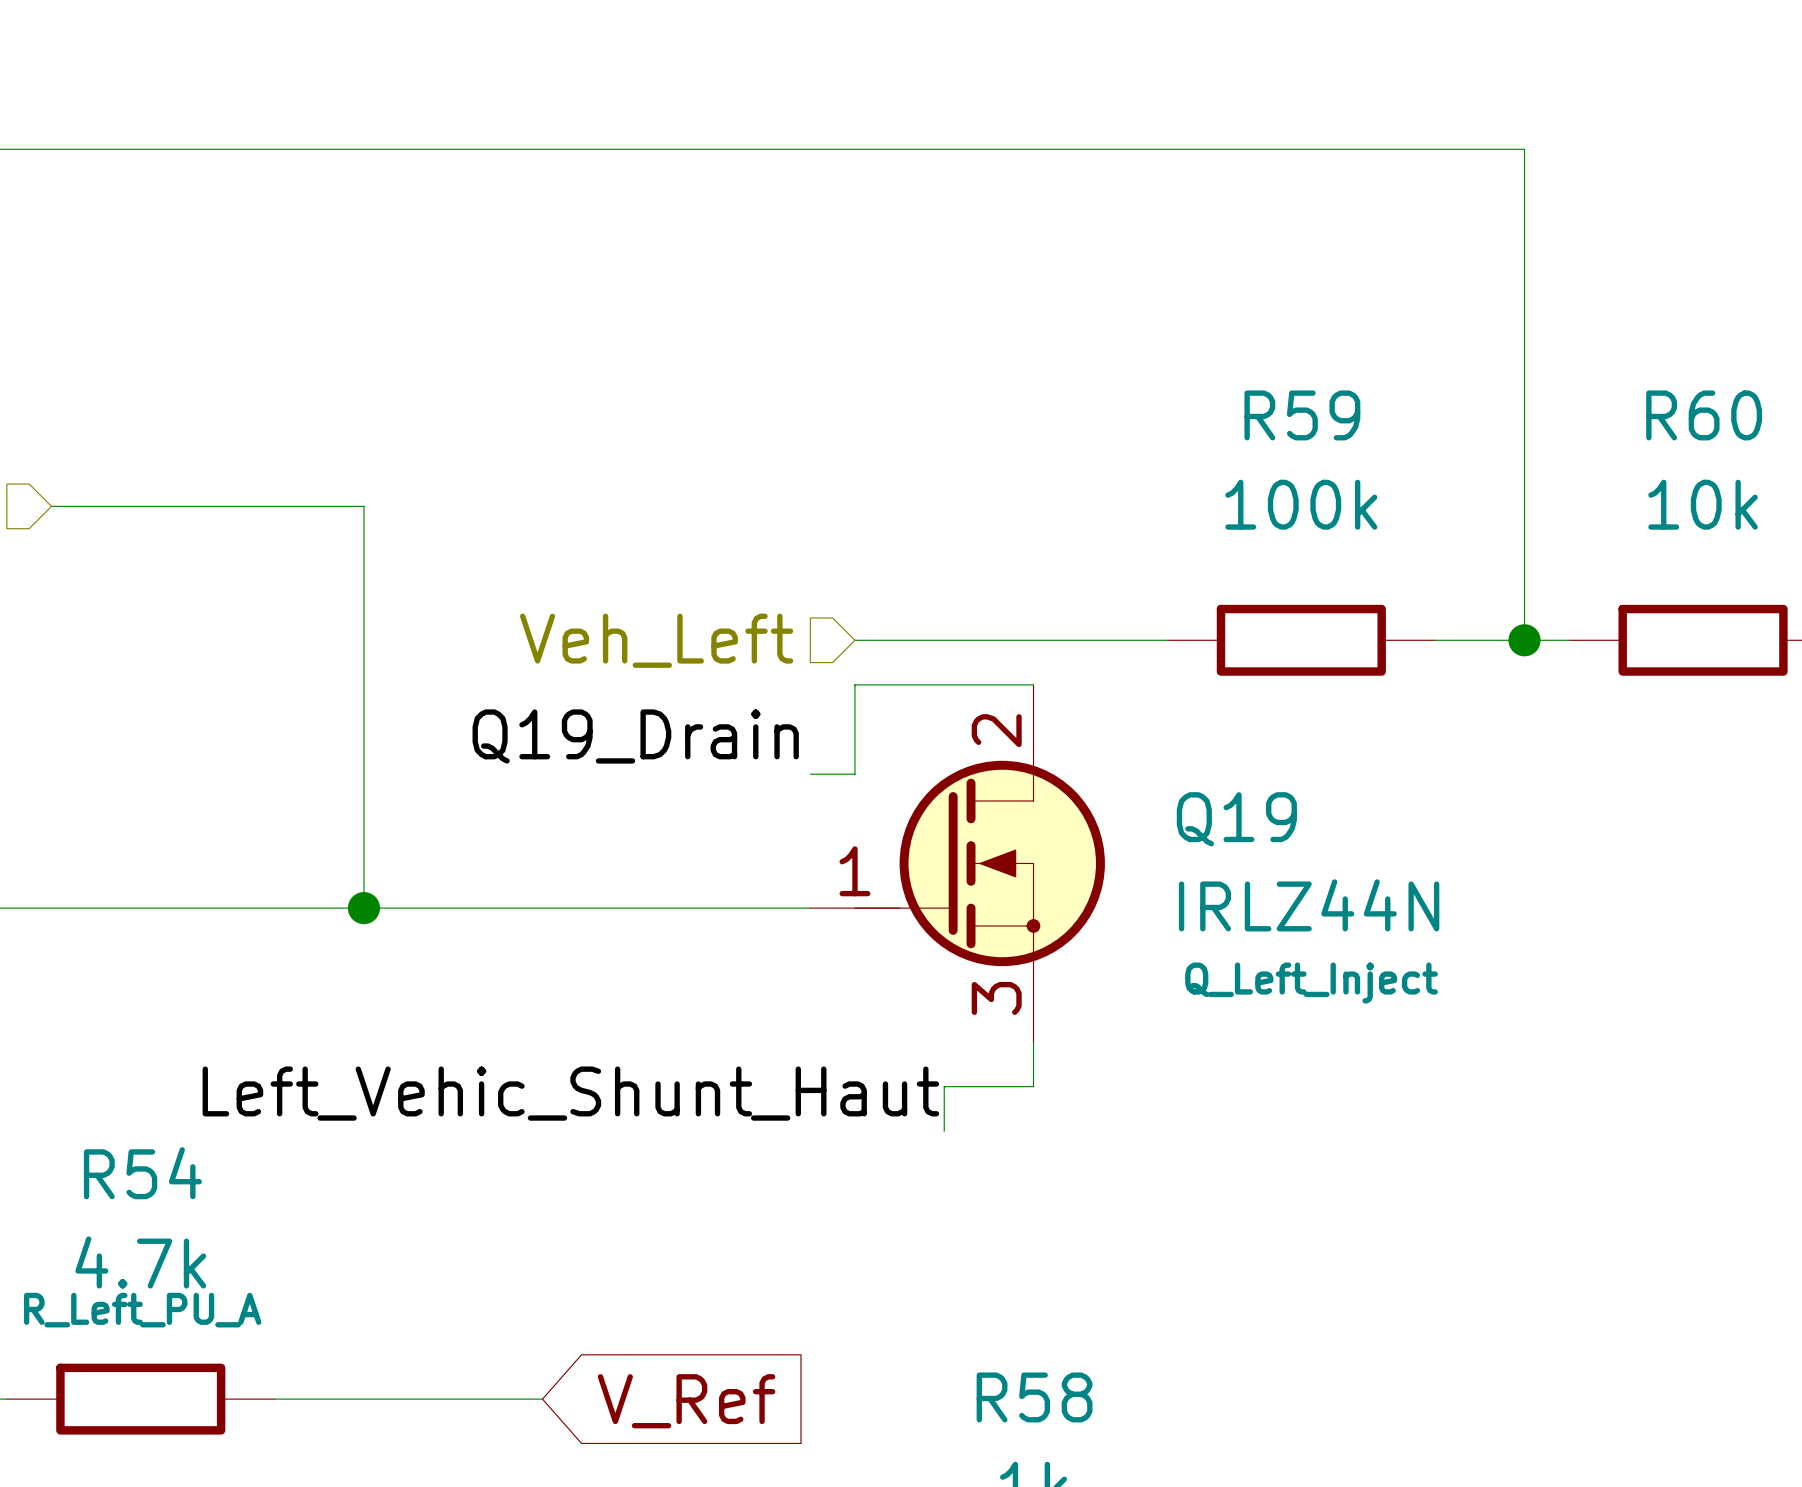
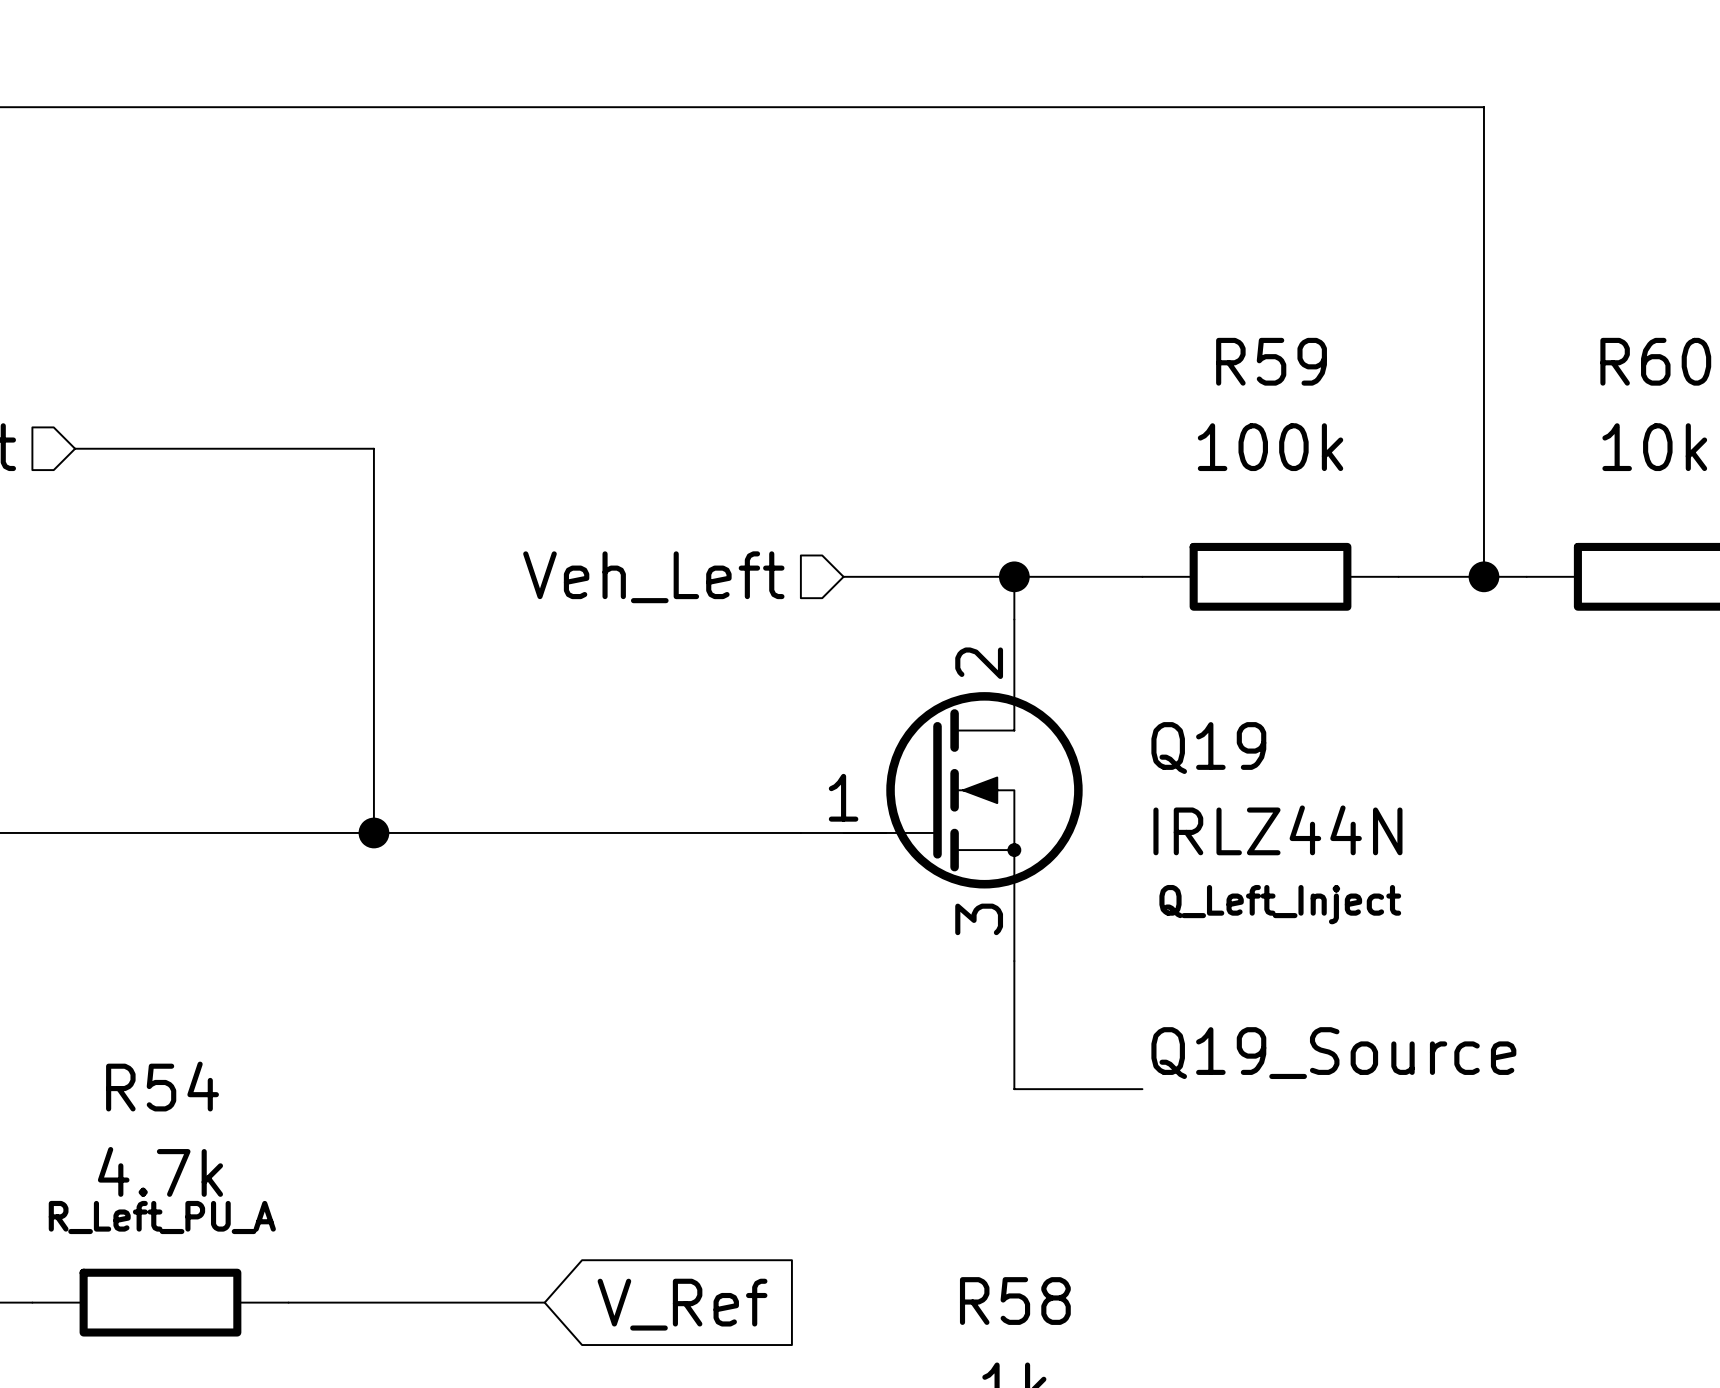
junction: none -> (1014, 576)
wire: (1033, 684) (854, 684) (854, 774) (810, 774) -> (1014, 619) (1014, 576)
label: Q19_Drain (635, 736) -> none
wire: (1033, 1086) (944, 1086) (944, 1131) -> (1014, 1003) (1014, 1089) (1142, 1089)
label: Left_Vehic_Shunt_Haut (570, 1093) -> none
label: none -> Q19_Source (1333, 1053)

